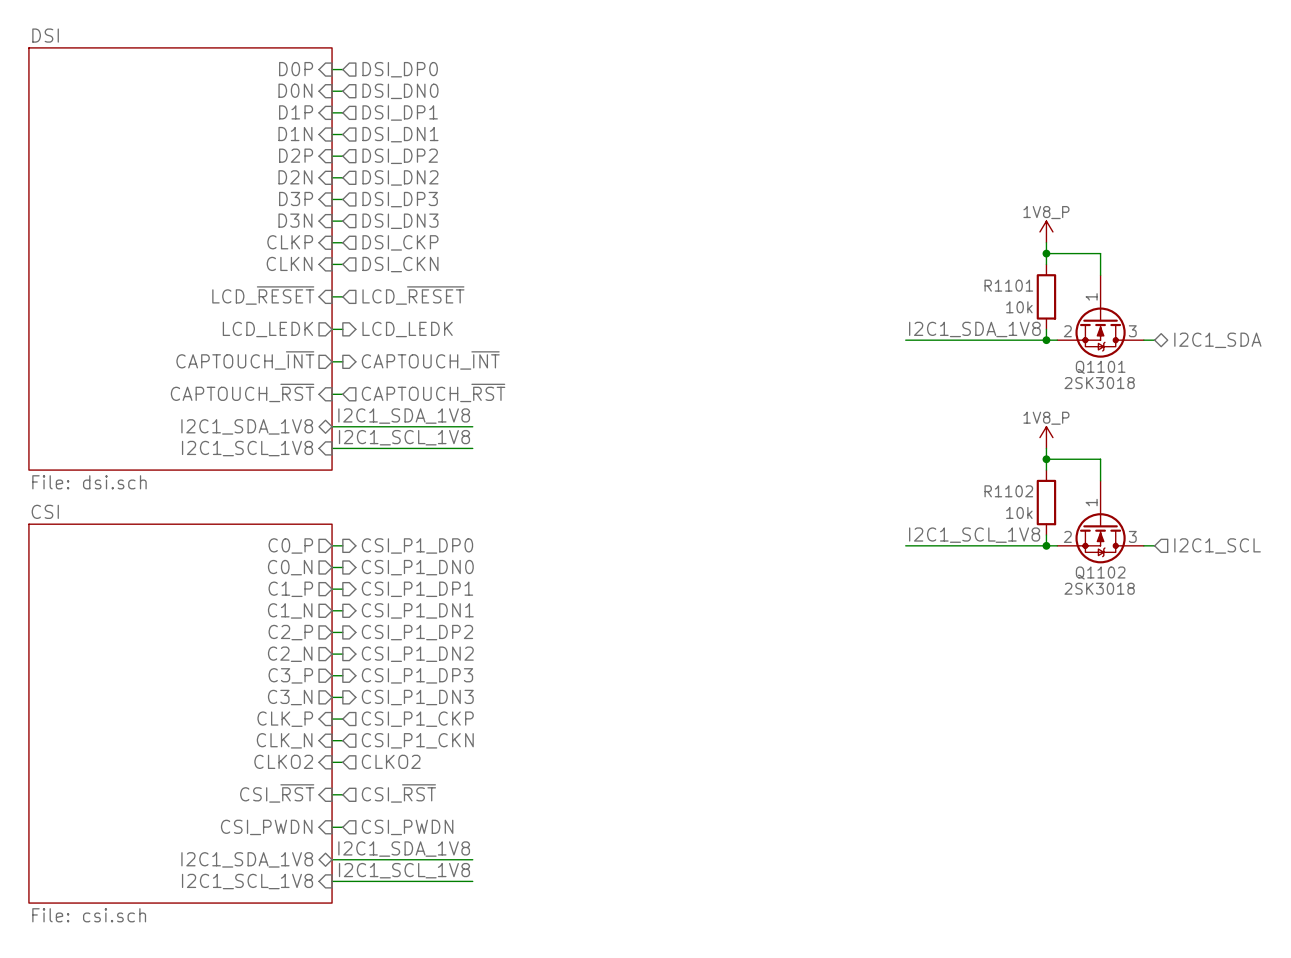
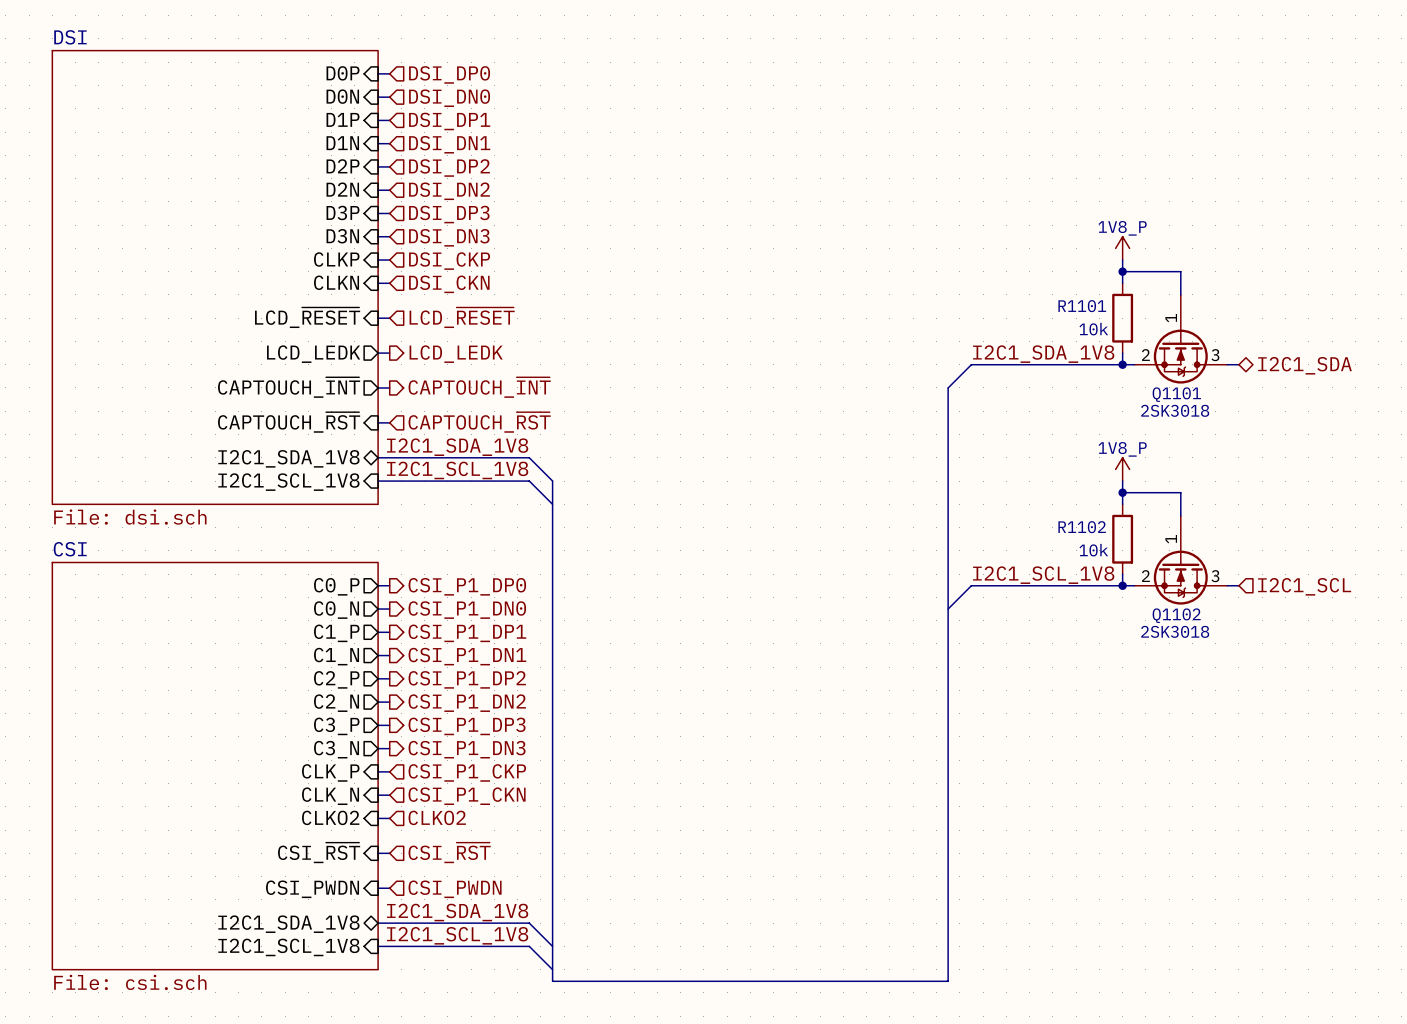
sheet pin position: D0P (296, 69) -> D0P (343, 73)
wire: (332, 69) (342, 69) -> (378, 73) (389, 73)
hierarchical label position: DSI_DP0 (400, 69) -> DSI_DP0 (449, 74)
sheet pin position: D0N (295, 90) -> D0N (342, 96)
wire: (332, 91) (342, 91) -> (378, 97) (389, 97)
hierarchical label position: DSI_DN0 (400, 91) -> DSI_DN0 (449, 98)
sheet pin position: D1P (296, 112) -> D1P (343, 119)
wire: (332, 112) (342, 112) -> (378, 120) (389, 120)
hierarchical label position: DSI_DP1 (400, 113) -> DSI_DP1 (449, 121)
sheet pin position: D1N (295, 134) -> D1N (342, 143)
wire: (332, 134) (342, 134) -> (378, 143) (389, 143)
hierarchical label position: DSI_DN1 (400, 134) -> DSI_DN1 (449, 144)
sheet pin position: D2P (296, 155) -> D2P (343, 166)
wire: (332, 156) (342, 156) -> (378, 166) (389, 166)
hierarchical label position: DSI_DP2 (400, 156) -> DSI_DP2 (449, 168)
sheet pin position: D2N (295, 177) -> D2N (342, 189)
wire: (332, 177) (342, 177) -> (378, 190) (389, 190)
hierarchical label position: DSI_DN2 (400, 177) -> DSI_DN2 (449, 191)
sheet pin position: D3P (296, 198) -> D3P (343, 212)
wire: (332, 199) (342, 199) -> (378, 213) (389, 213)
hierarchical label position: DSI_DP3 (400, 199) -> DSI_DP3 (449, 214)
sheet pin position: D3N (295, 220) -> D3N (342, 236)
wire: (332, 221) (342, 221) -> (378, 236) (389, 236)
hierarchical label position: DSI_DN3 (400, 221) -> DSI_DN3 (449, 237)
sheet pin position: CLKP (290, 242) -> CLKP (336, 259)
wire: (332, 242) (342, 242) -> (378, 260) (389, 260)
hierarchical label position: DSI_CKP (400, 242) -> DSI_CKP (449, 261)
sheet DSI position: (180, 258) -> (215, 277)
sheet pin position: CLKN (289, 263) -> CLKN (336, 282)
wire: (332, 264) (342, 264) -> (378, 283) (389, 283)
hierarchical label position: DSI_CKN (400, 264) -> DSI_CKN (449, 284)
sheet pin position: LCD_~{RESET} (263, 295) -> LCD_~{RESET} (307, 317)
hierarchical label position: LCD_~{RESET} (413, 295) -> LCD_~{RESET} (462, 317)
wire: (332, 296) (342, 296) -> (378, 318) (389, 318)
sheet pin position: LCD_LEDK (267, 329) -> LCD_LEDK (313, 354)
wire: (332, 329) (342, 329) -> (378, 353) (389, 353)
hierarchical label position: LCD_LEDK (407, 329) -> LCD_LEDK (456, 354)
wire: none -> (971, 364) (948, 387)
sheet pin position: CAPTOUCH_~{INT} (245, 360) -> CAPTOUCH_~{INT} (289, 387)
hierarchical label position: CAPTOUCH_~{INT} (430, 360) -> CAPTOUCH_~{INT} (479, 387)
wire: (332, 361) (342, 361) -> (378, 387) (389, 387)
bus: none -> (948, 387) (948, 981) (552, 981) (552, 481)
sheet pin position: CAPTOUCH_~{RST} (242, 392) -> CAPTOUCH_~{RST} (289, 422)
hierarchical label position: CAPTOUCH_~{RST} (433, 392) -> CAPTOUCH_~{RST} (479, 422)
wire: (332, 394) (342, 394) -> (378, 422) (389, 422)
label position: I2C1_SDA_1V8 (404, 416) -> I2C1_SDA_1V8 (457, 447)
sheet pin position: I2C1_SDA_1V8 (247, 426) -> I2C1_SDA_1V8 (288, 458)
wire: (332, 426) (353, 426) -> none
wire: none -> (506, 457) (529, 457) (552, 481)
label position: I2C1_SCL_1V8 (404, 437) -> I2C1_SCL_1V8 (457, 470)
sheet pin position: I2C1_SCL_1V8 (247, 448) -> I2C1_SCL_1V8 (288, 482)
wire: (332, 448) (353, 448) -> none
wire: none -> (506, 481) (529, 481) (552, 504)
sheet pin position: C0_P (290, 545) -> C0_P (336, 586)
wire: (332, 545) (342, 545) -> (378, 585) (389, 585)
hierarchical label position: CSI_P1_DP0 (417, 545) -> CSI_P1_DP0 (467, 586)
wire: none -> (971, 585) (948, 609)
sheet pin position: C0_N (290, 567) -> C0_N (336, 610)
wire: (332, 567) (342, 567) -> (378, 609) (389, 609)
hierarchical label position: CSI_P1_DN0 (417, 567) -> CSI_P1_DN0 (467, 610)
sheet pin position: C1_P (290, 589) -> C1_P (336, 633)
wire: (332, 589) (342, 589) -> (378, 632) (389, 632)
hierarchical label position: CSI_P1_DP1 (417, 589) -> CSI_P1_DP1 (467, 633)
sheet pin position: C1_N (290, 610) -> C1_N (336, 656)
wire: (332, 610) (342, 610) -> (378, 655) (389, 655)
hierarchical label position: CSI_P1_DN1 (417, 610) -> CSI_P1_DN1 (467, 656)
sheet pin position: C2_P (290, 632) -> C2_P (336, 679)
wire: (332, 632) (342, 632) -> (378, 678) (389, 678)
hierarchical label position: CSI_P1_DP2 (417, 632) -> CSI_P1_DP2 (467, 679)
sheet pin position: C2_N (290, 654) -> C2_N (336, 703)
wire: (332, 654) (342, 654) -> (378, 702) (389, 702)
hierarchical label position: CSI_P1_DN2 (417, 654) -> CSI_P1_DN2 (467, 703)
sheet pin position: C3_P (290, 675) -> C3_P (336, 726)
wire: (332, 675) (342, 675) -> (378, 725) (389, 725)
hierarchical label position: CSI_P1_DP3 (417, 675) -> CSI_P1_DP3 (467, 726)
sheet pin position: C3_N (290, 697) -> C3_N (336, 749)
wire: (332, 697) (342, 697) -> (378, 748) (389, 748)
hierarchical label position: CSI_P1_DN3 (417, 697) -> CSI_P1_DN3 (467, 749)
sheet CSI position: (180, 713) -> (215, 766)
sheet pin position: CLK_P (285, 719) -> CLK_P (330, 772)
wire: (332, 719) (342, 719) -> (378, 771) (389, 771)
hierarchical label position: CSI_P1_CKP (417, 719) -> CSI_P1_CKP (467, 772)
sheet pin position: CLK_N (284, 740) -> CLK_N (330, 796)
wire: (332, 740) (342, 740) -> (378, 795) (389, 795)
hierarchical label position: CSI_P1_CKN (417, 740) -> CSI_P1_CKN (467, 796)
sheet pin position: CLKO2 (283, 761) -> CLKO2 (330, 817)
hierarchical label position: CLKO2 (391, 761) -> CLKO2 (437, 817)
wire: (332, 762) (342, 762) -> (378, 818) (389, 818)
sheet pin position: CSI_~{RST} (277, 793) -> CSI_~{RST} (319, 852)
hierarchical label position: CSI_~{RST} (398, 793) -> CSI_~{RST} (449, 852)
wire: (332, 794) (342, 794) -> (378, 853) (389, 853)
sheet pin position: CSI_PWDN (266, 827) -> CSI_PWDN (312, 889)
wire: (332, 827) (342, 827) -> (378, 888) (389, 888)
hierarchical label position: CSI_PWDN (407, 827) -> CSI_PWDN (455, 889)
label position: I2C1_SDA_1V8 (404, 849) -> I2C1_SDA_1V8 (457, 912)
sheet pin position: I2C1_SDA_1V8 (247, 859) -> I2C1_SDA_1V8 (288, 924)
wire: (332, 859) (353, 859) -> none
wire: none -> (506, 923) (529, 923) (552, 946)
label position: I2C1_SCL_1V8 (404, 870) -> I2C1_SCL_1V8 (457, 935)
sheet pin position: I2C1_SCL_1V8 (247, 881) -> I2C1_SCL_1V8 (288, 947)
wire: (332, 881) (353, 881) -> none
wire: none -> (506, 946) (529, 946) (552, 969)

